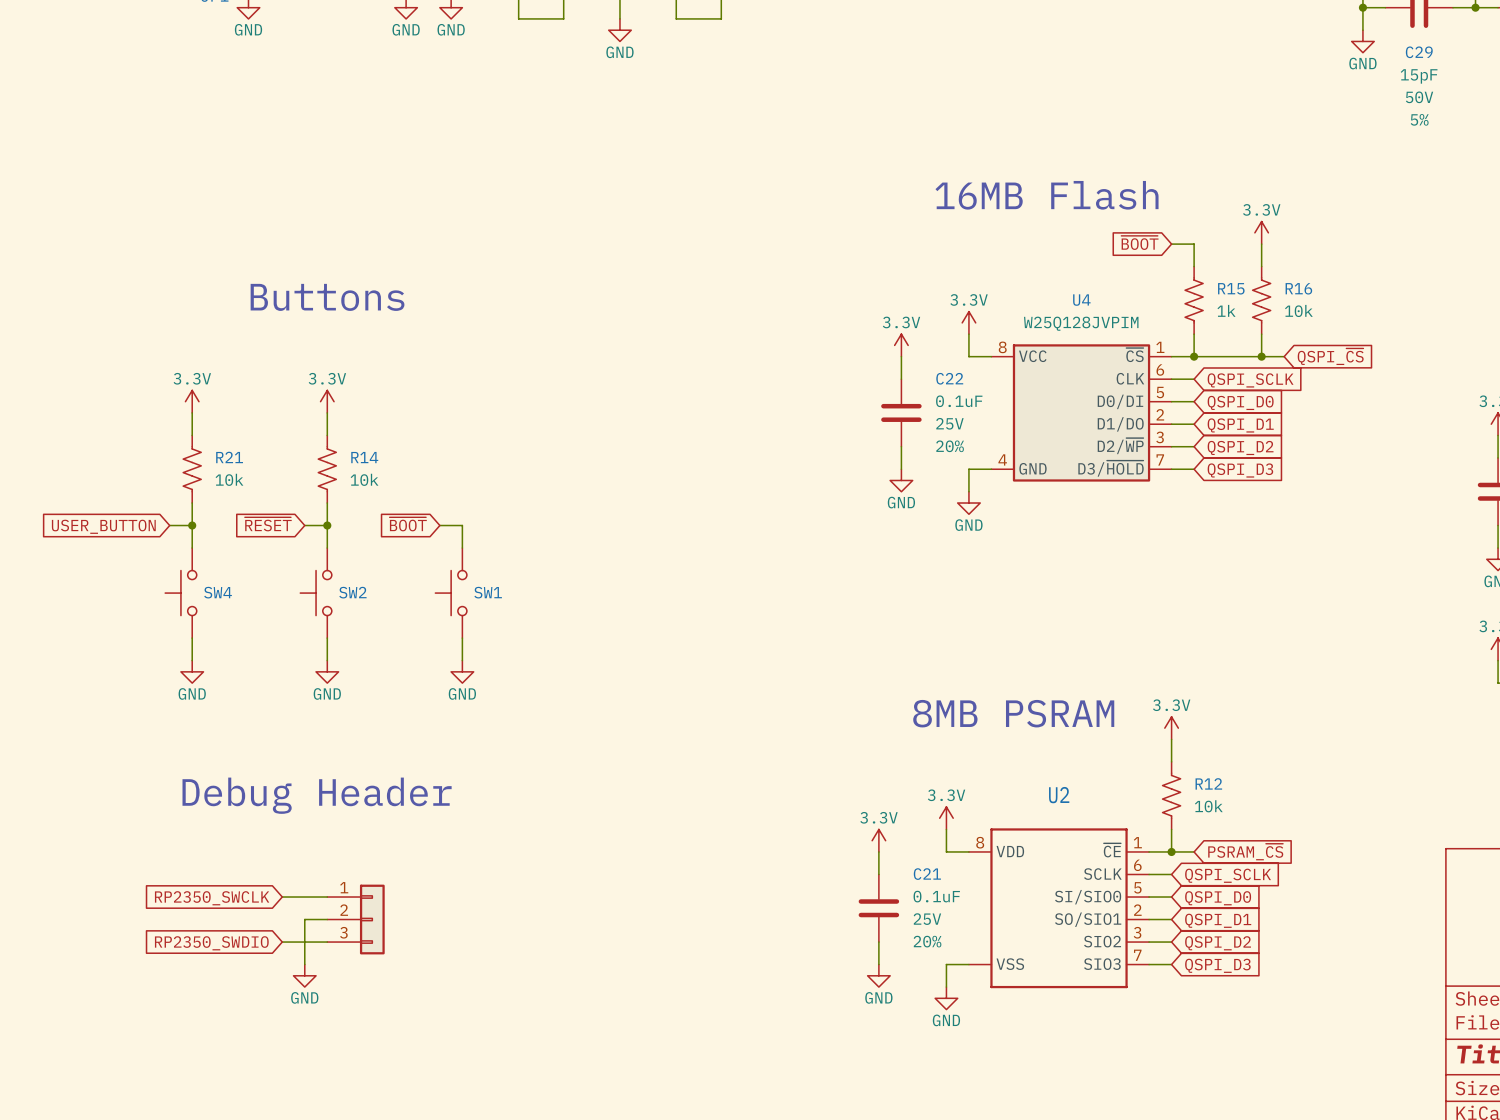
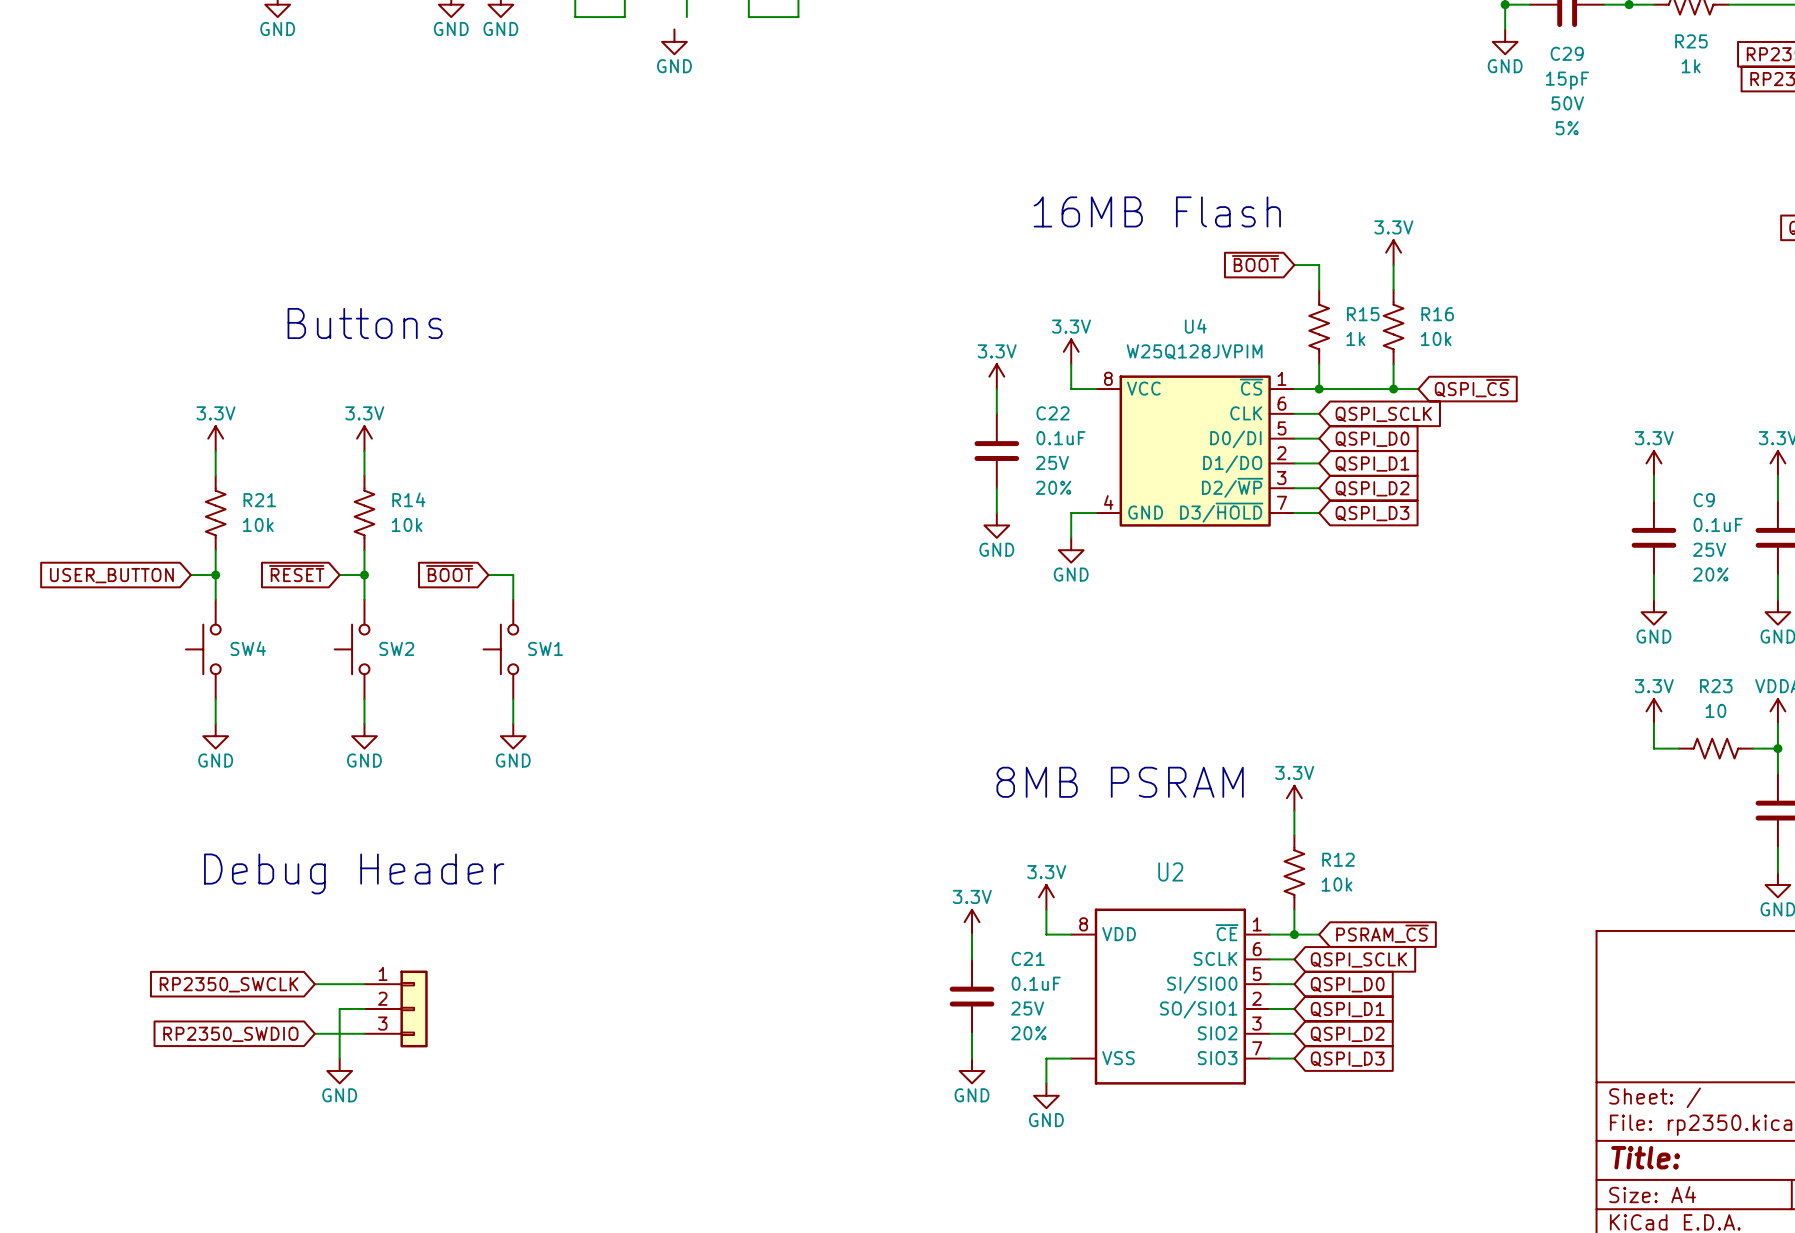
power symbol position: GND (619, 30) -> GND (674, 41)

